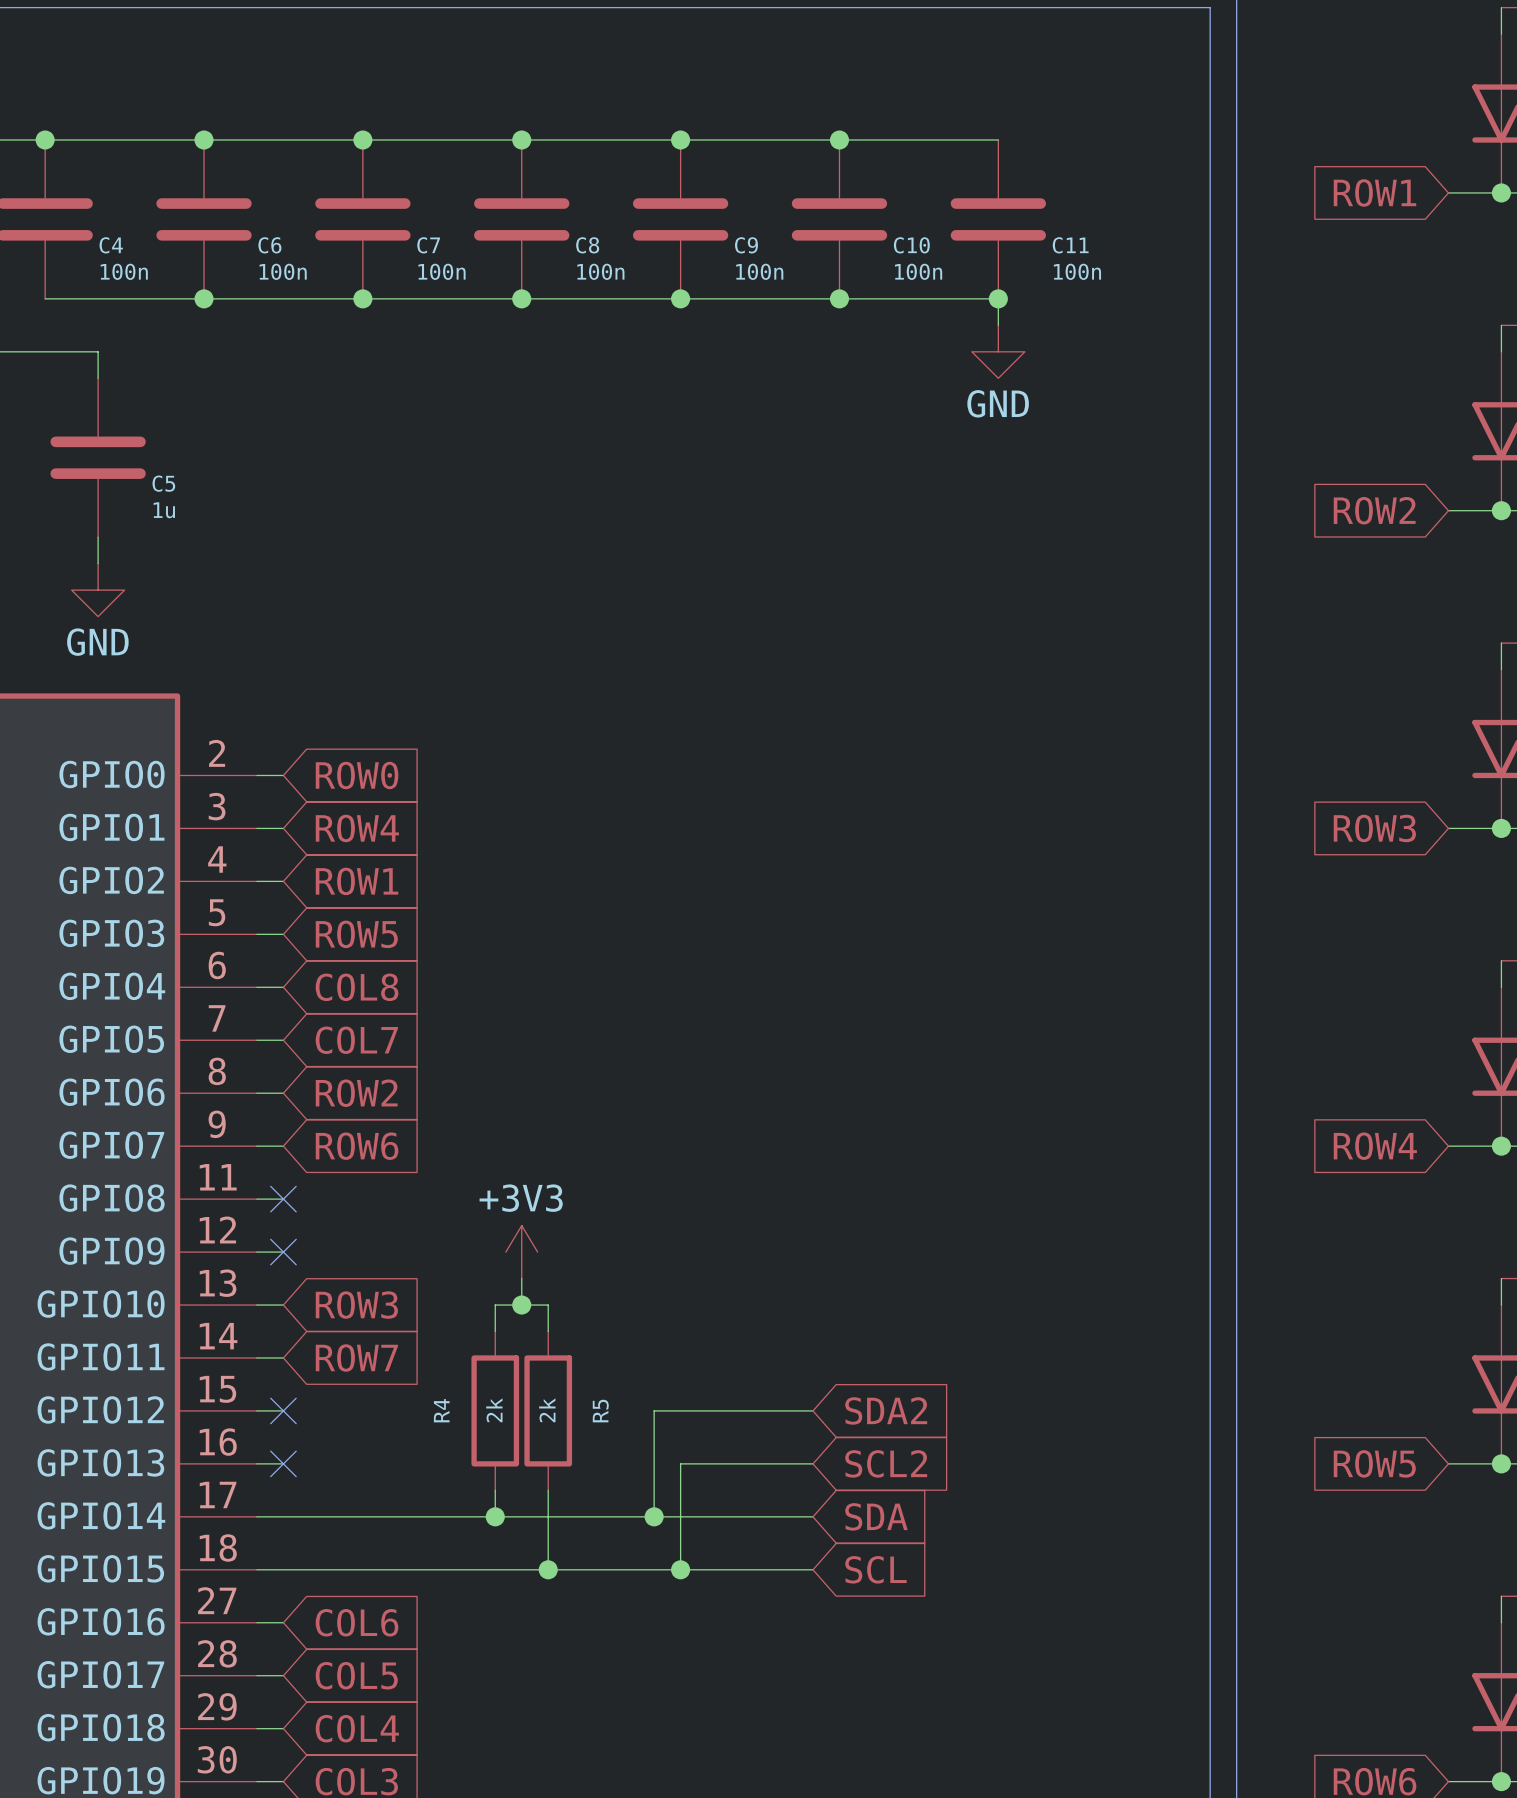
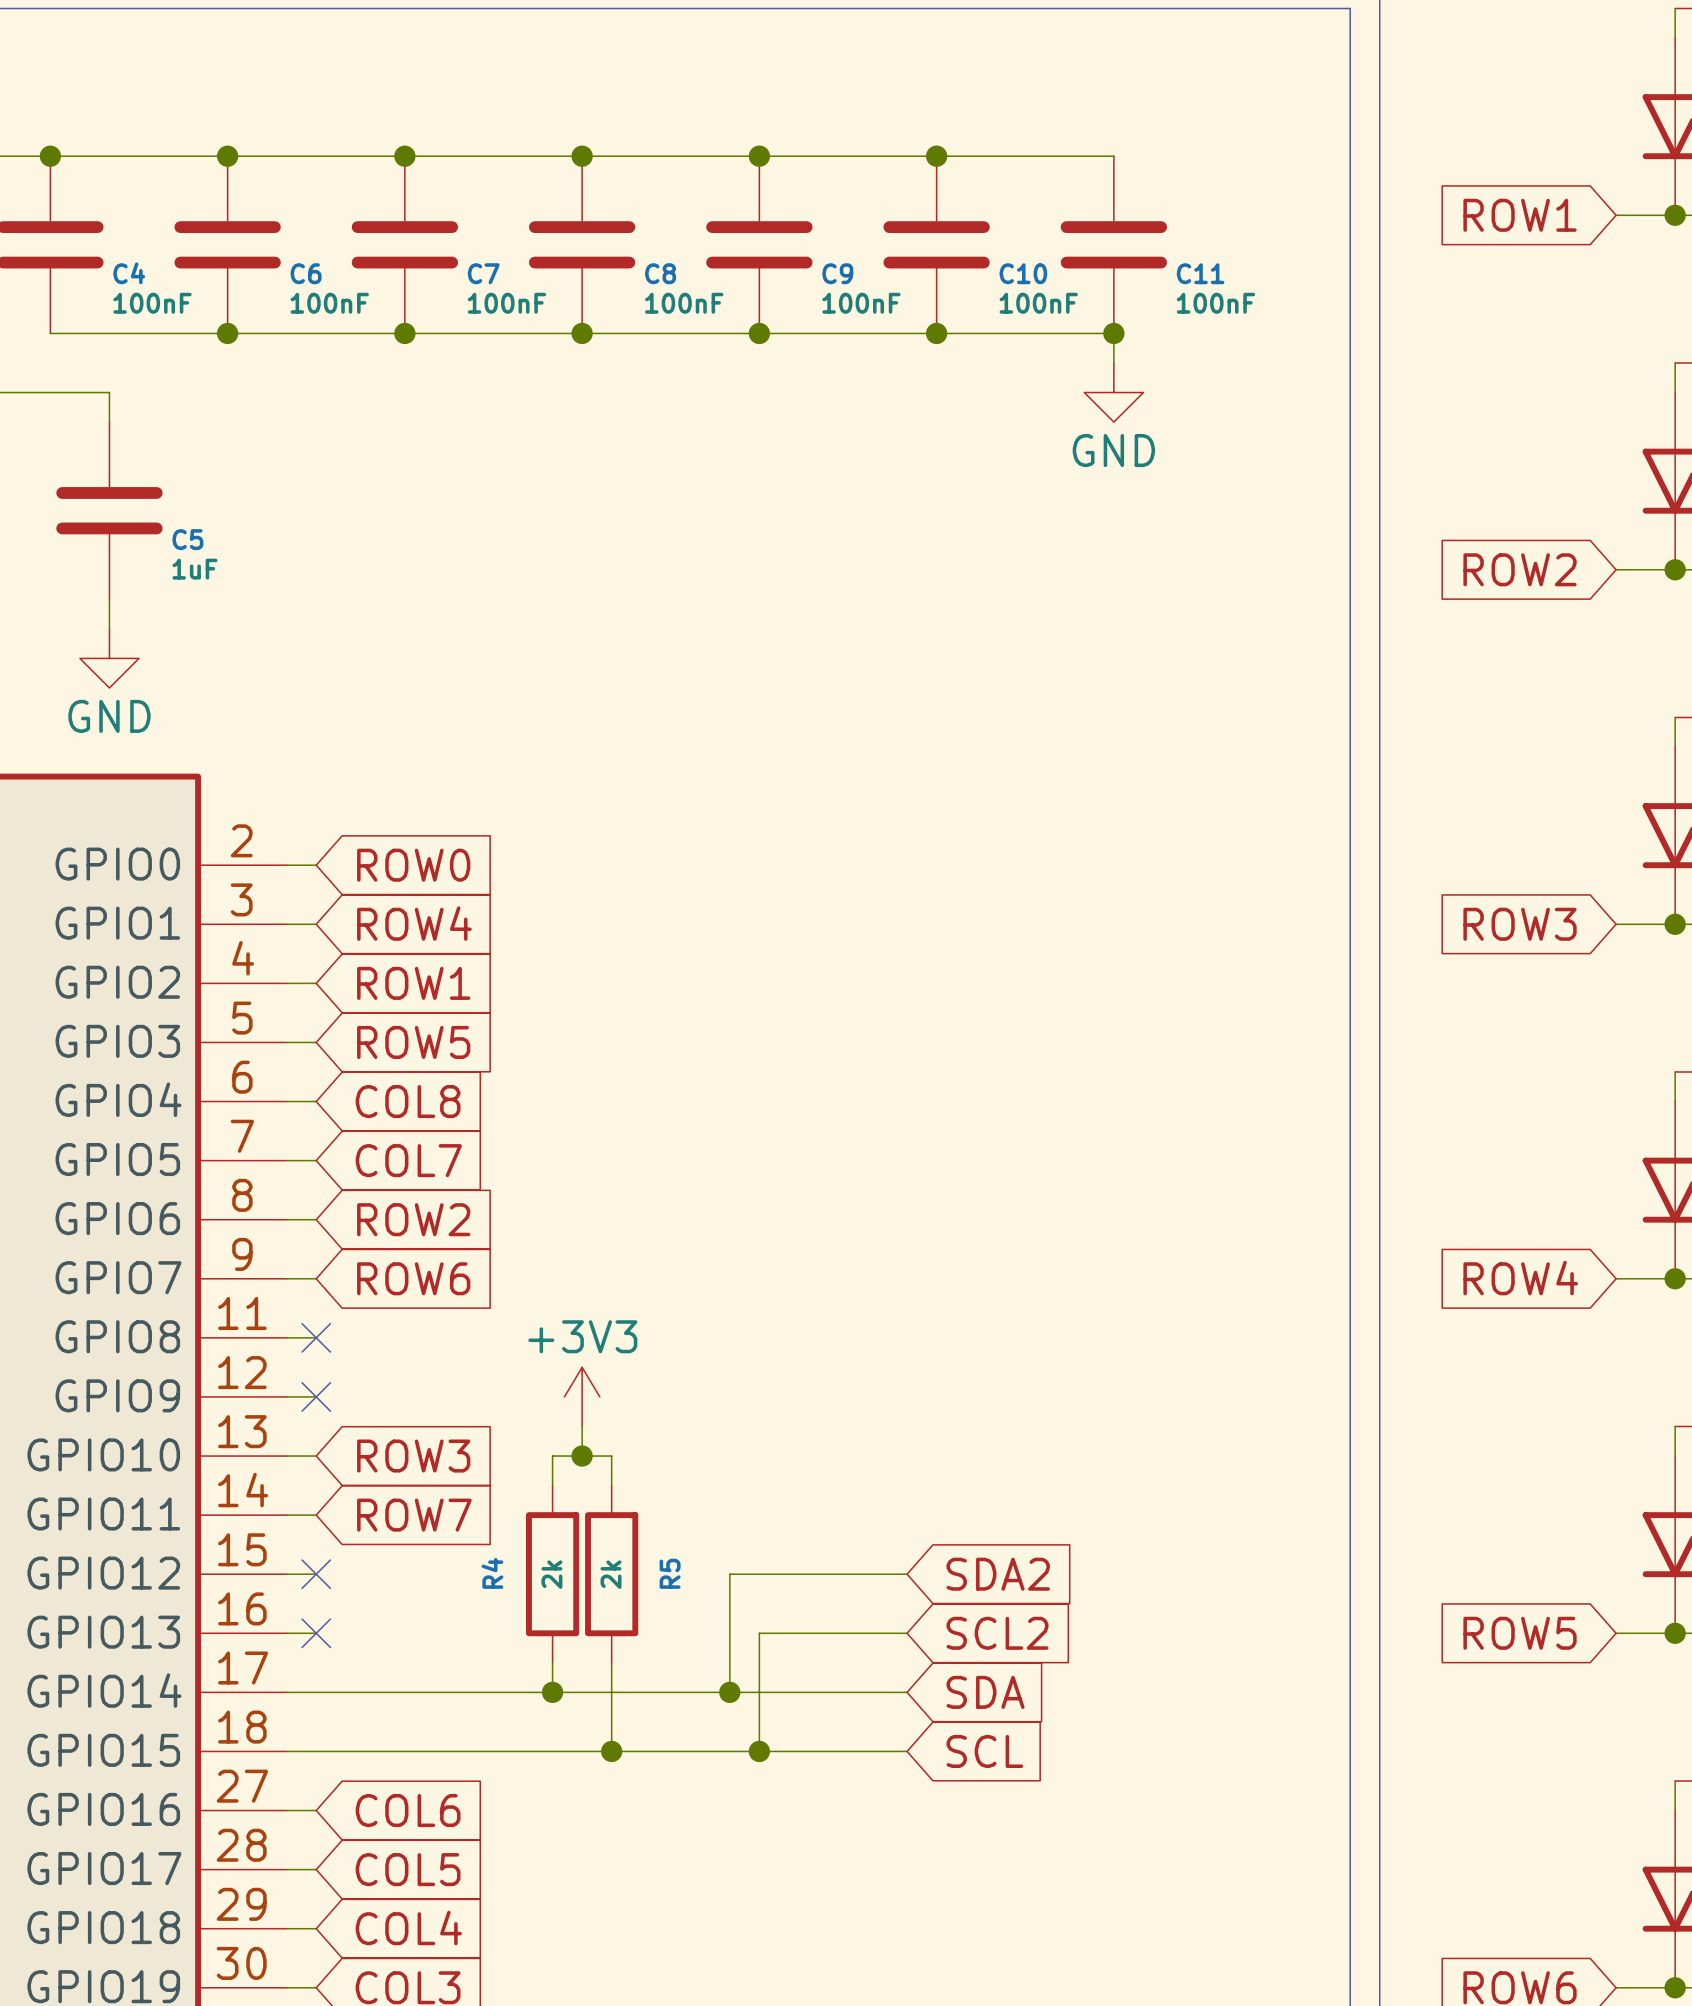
C4 value: 100n (124, 271) -> 100nF (152, 303)
C6 value: 100n (283, 271) -> 100nF (329, 303)
C7 value: 100n (441, 271) -> 100nF (506, 303)
C8 value: 100n (600, 271) -> 100nF (684, 303)
C9 value: 100n (759, 271) -> 100nF (861, 303)
C10 value: 100n (918, 271) -> 100nF (1038, 303)
C11 value: 100n (1077, 271) -> 100nF (1215, 303)
C5 value: 1u (164, 510) -> 1uF (194, 569)

